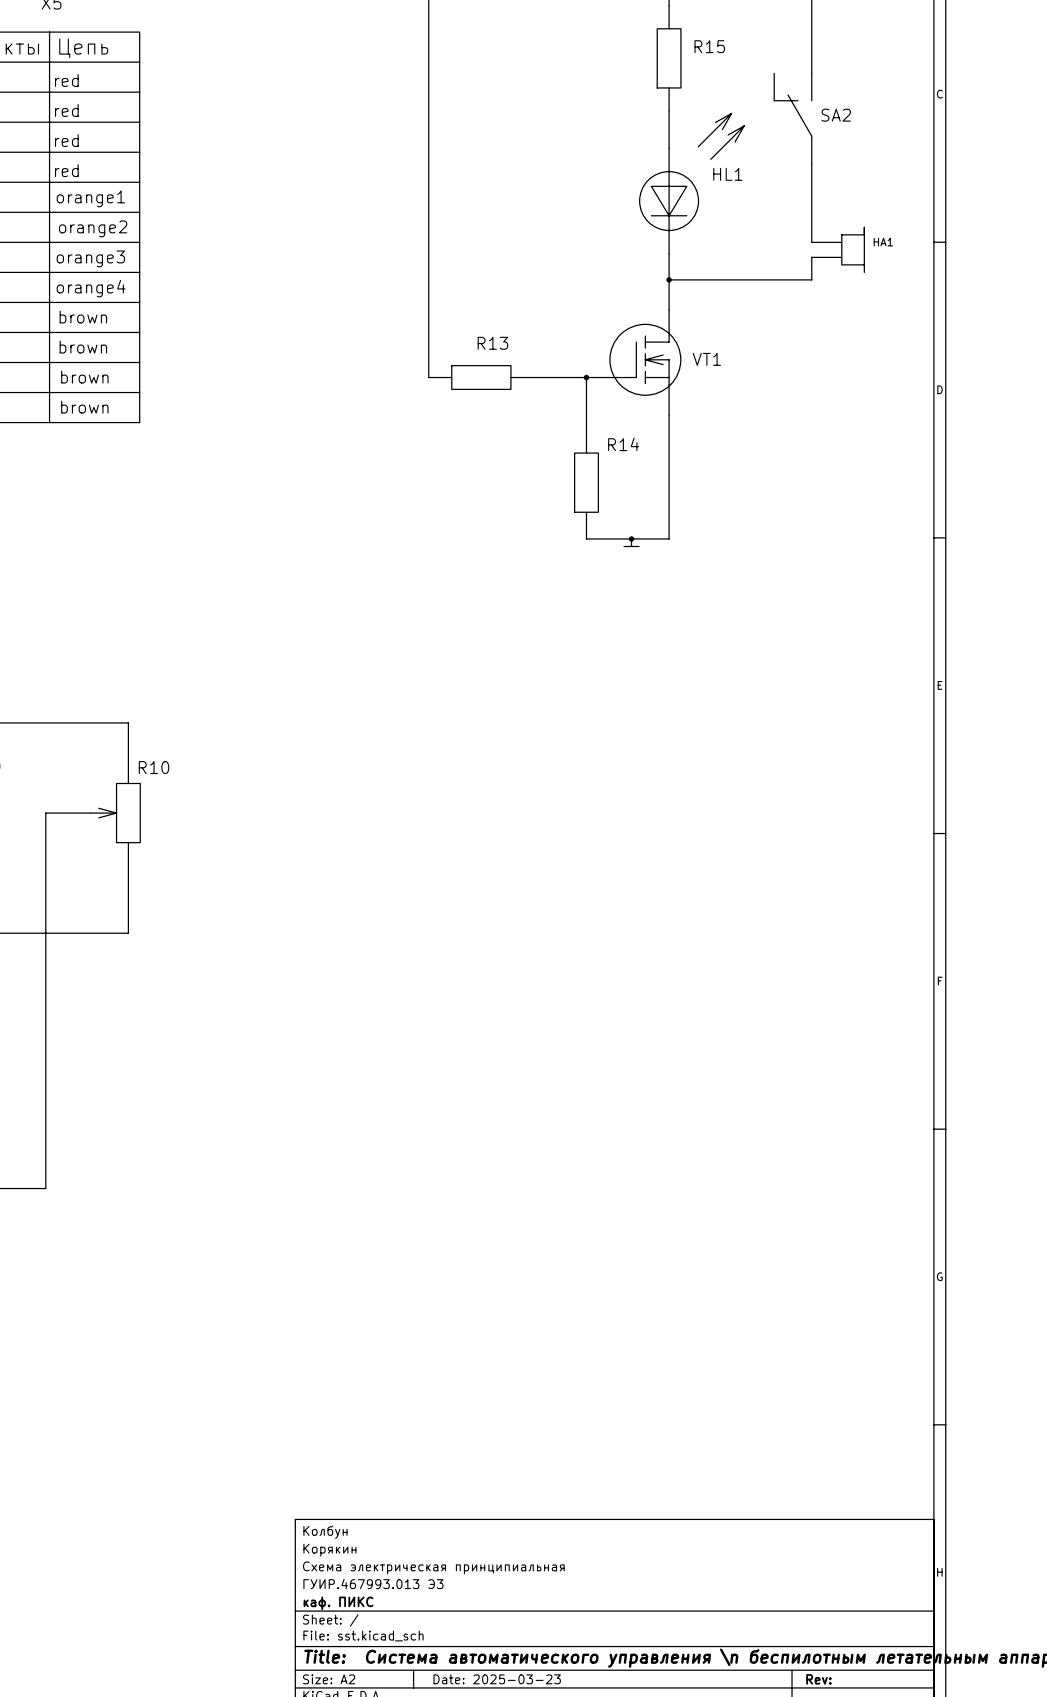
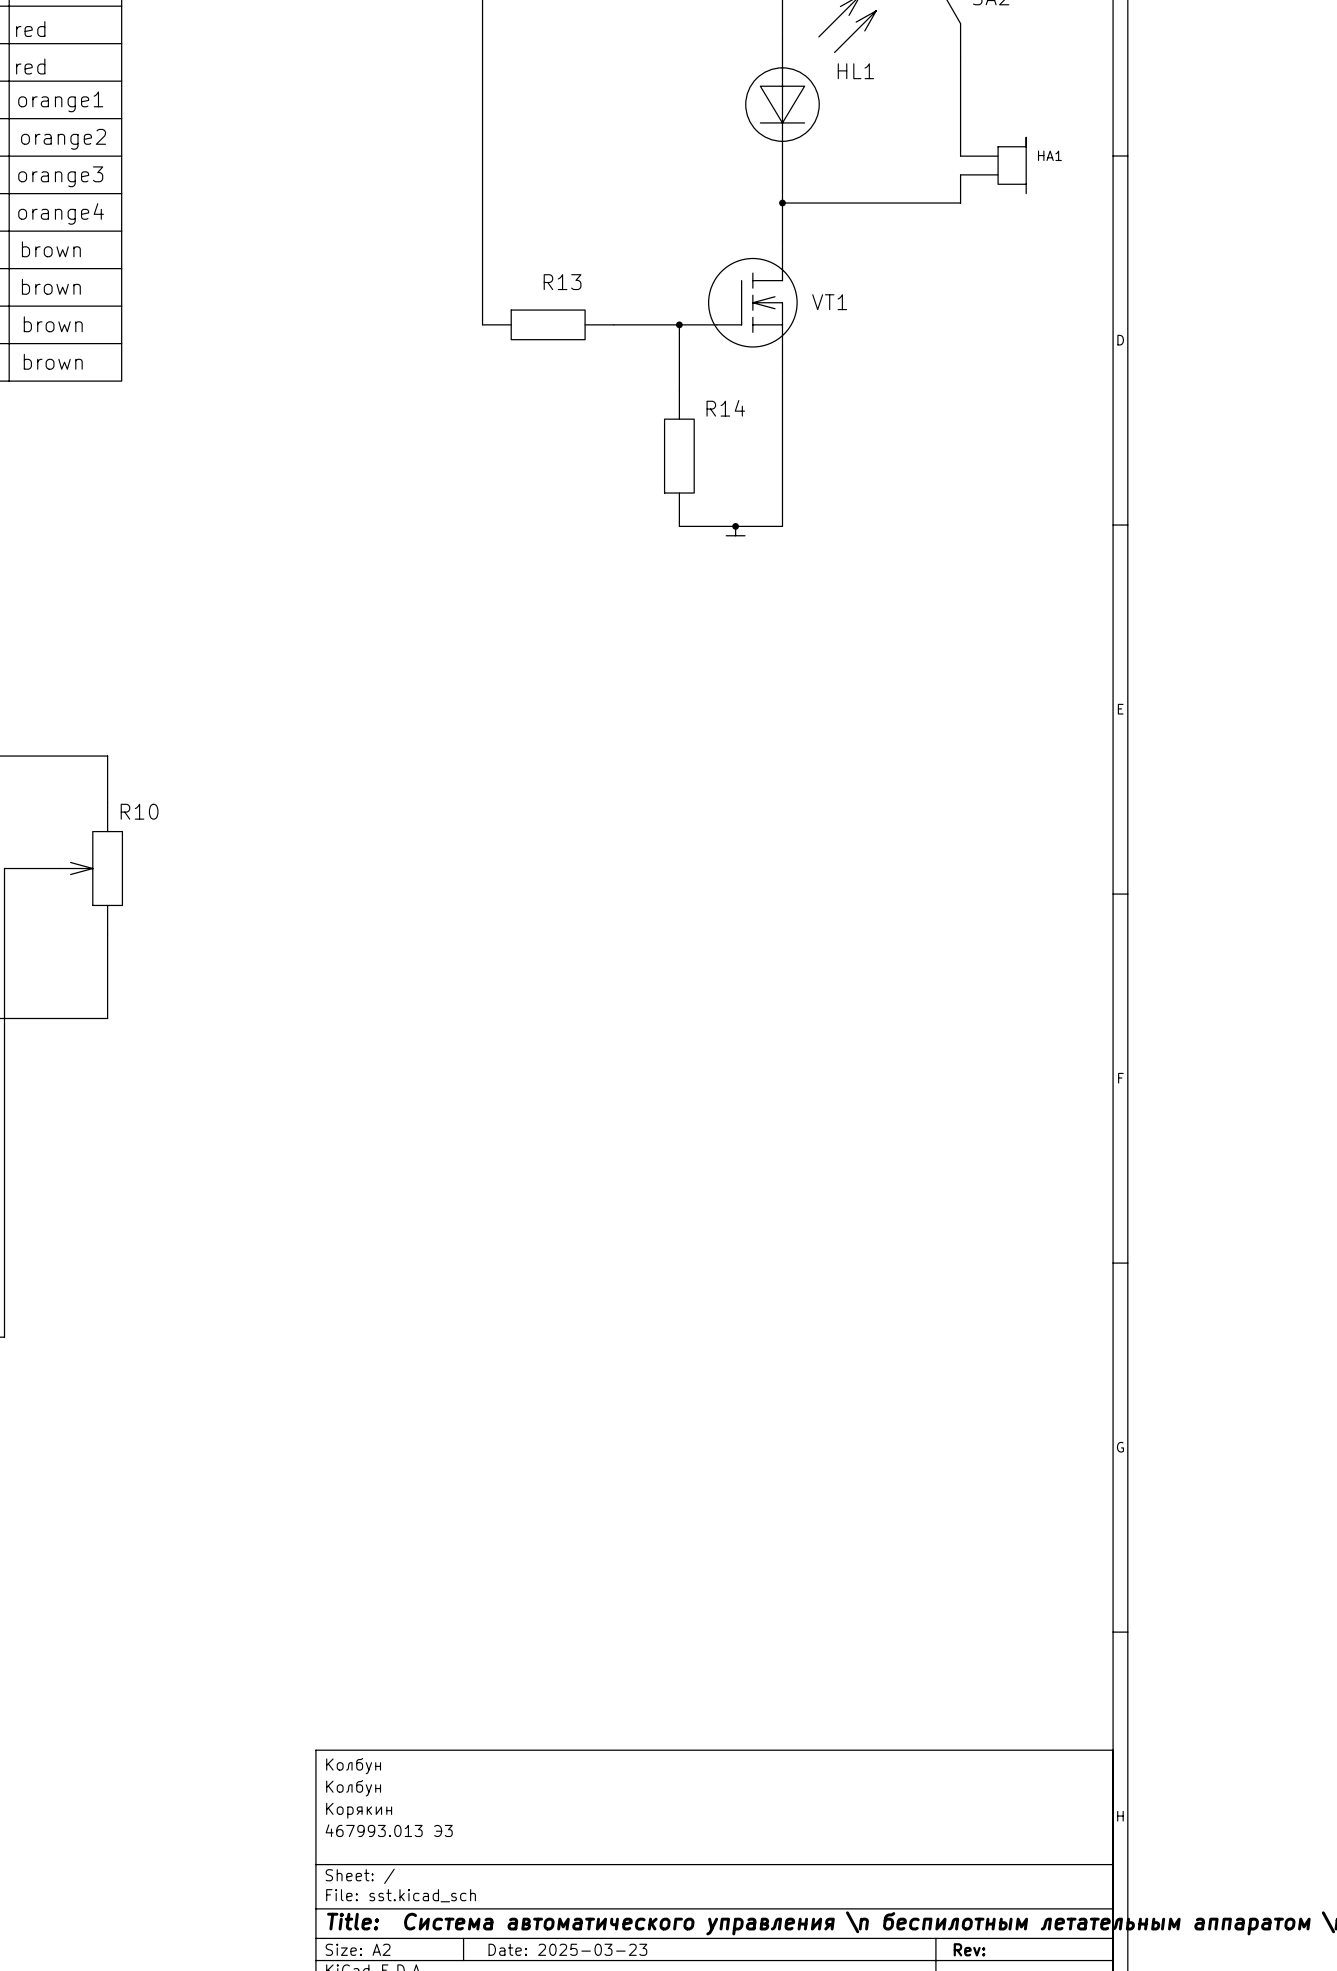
title block: Корякин (329, 1550) -> Колбун (353, 1788)
title block: Схема электрическая принципиальная (433, 1567) -> Корякин (359, 1810)
title block: ГУИР.467993.013 Э3 (373, 1583) -> 467993.013 Э3 (389, 1830)
title block: каф. ПИКС (338, 1603) -> none

